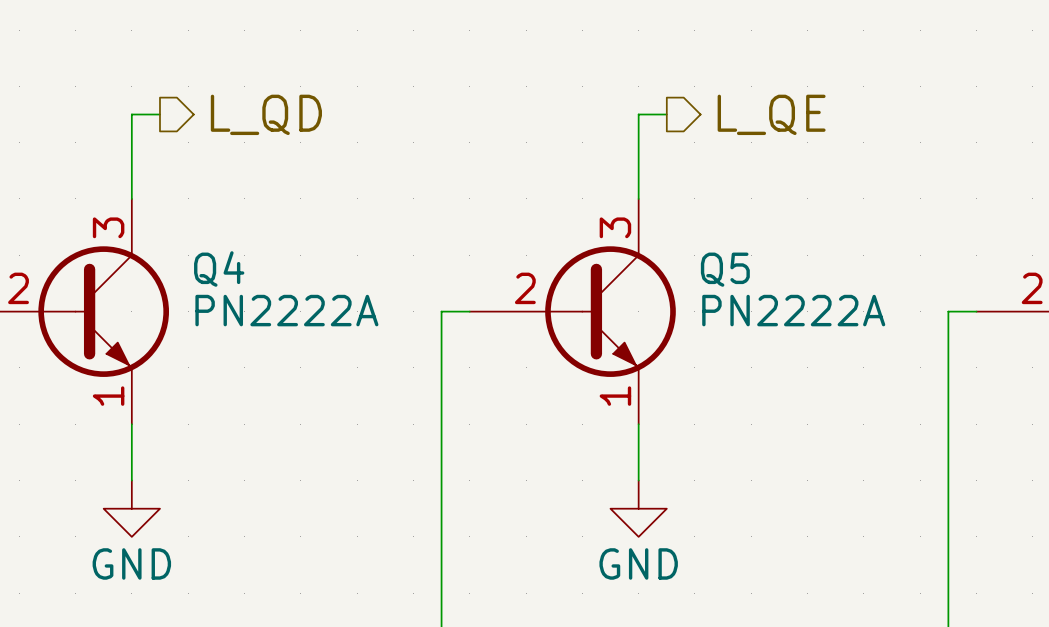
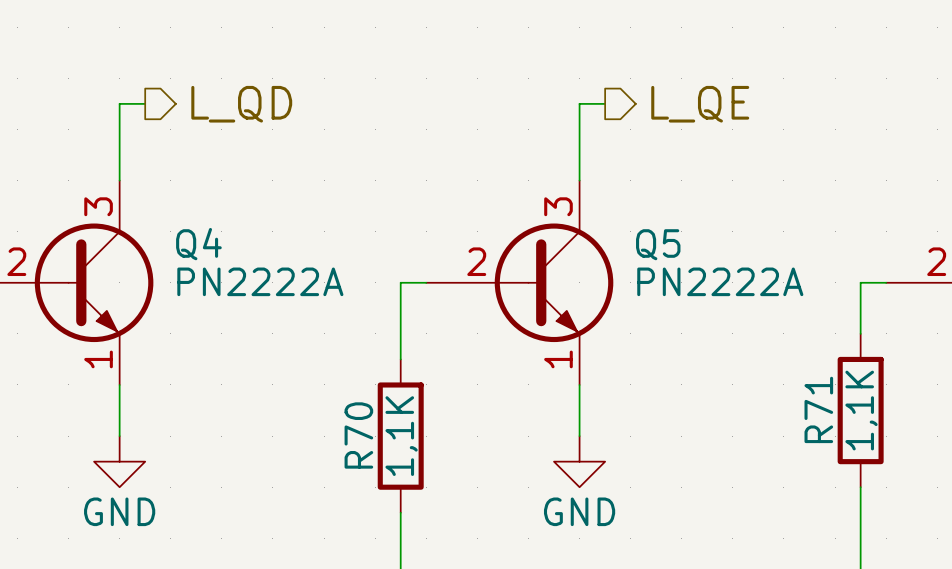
wire: (948, 367) (948, 536) -> none
wire: (441, 396) (441, 565) -> none
R71: none -> 1,1K (860, 410)
R70: none -> 1,1K (400, 436)

